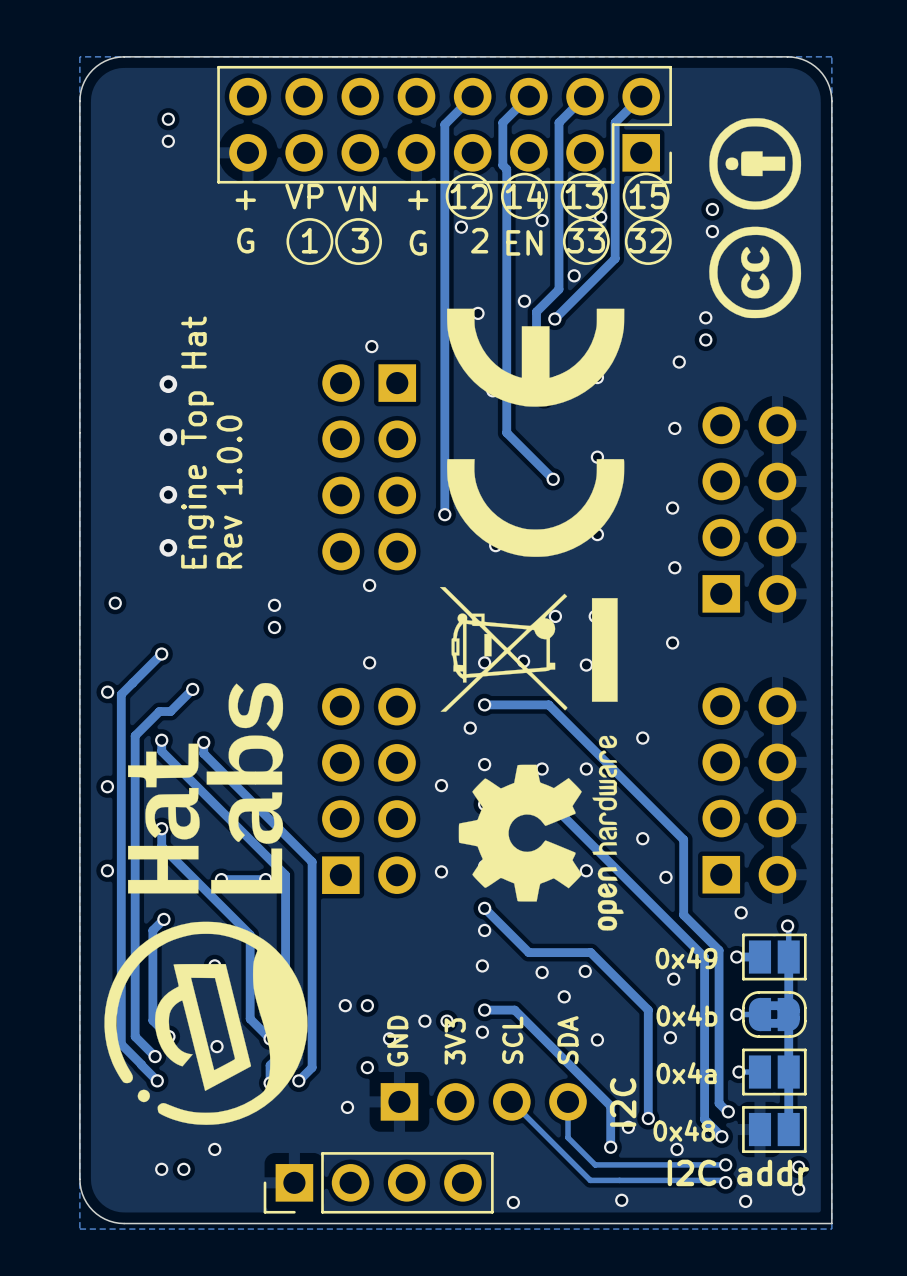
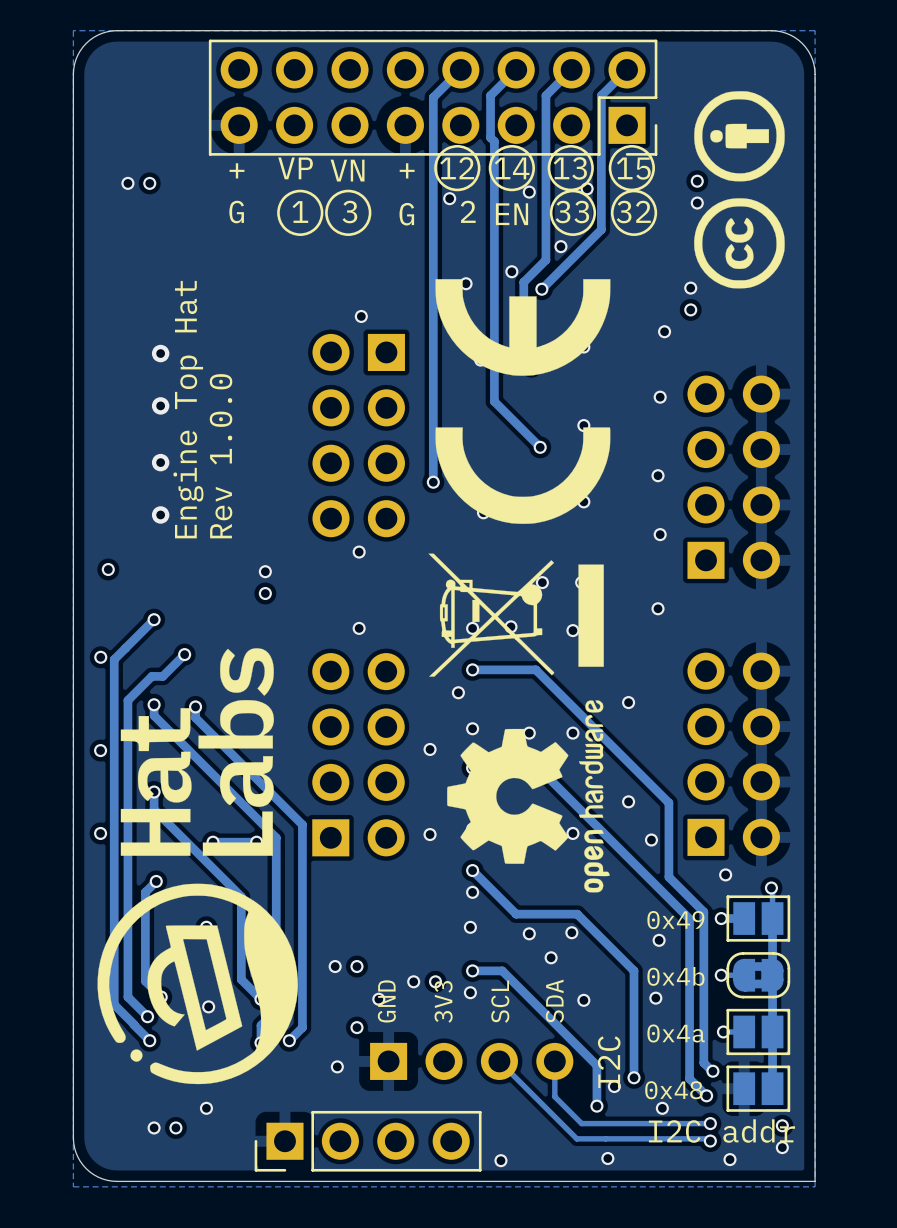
via: (168, 119) -> none
via: (168, 141) -> none
via: none -> (127, 183)
via: none -> (149, 183)

